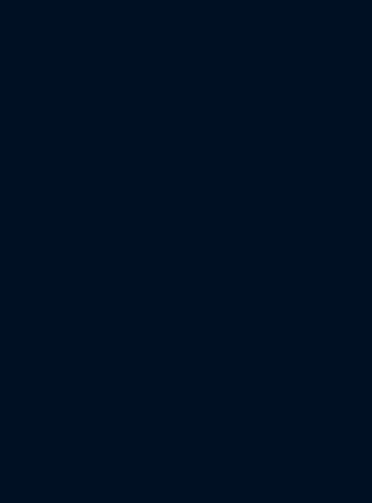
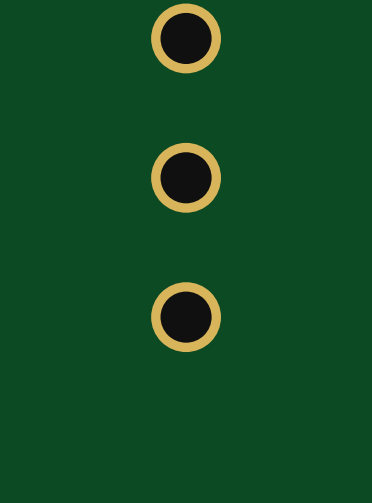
part: none -> (186, 38)
part: none -> (186, 177)
part: none -> (186, 317)

